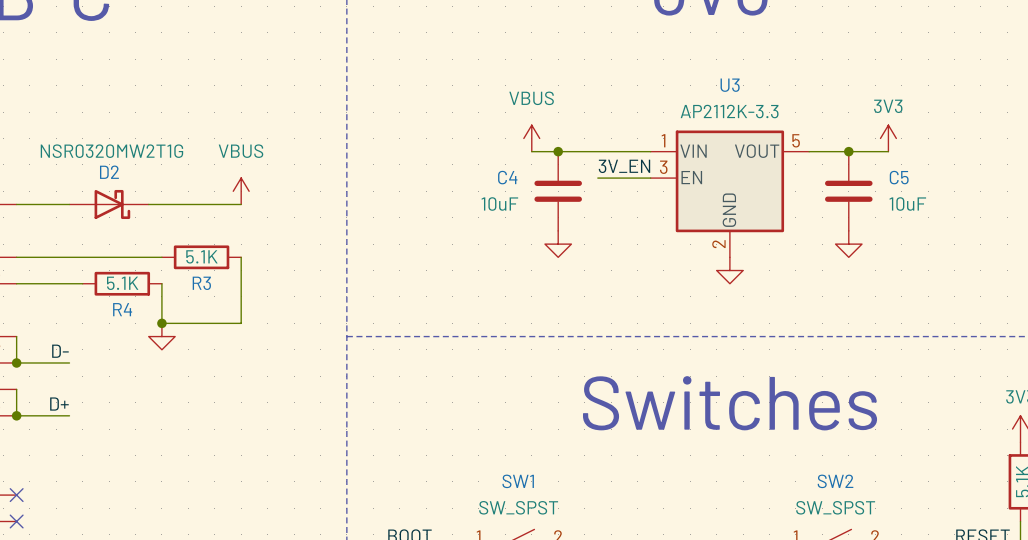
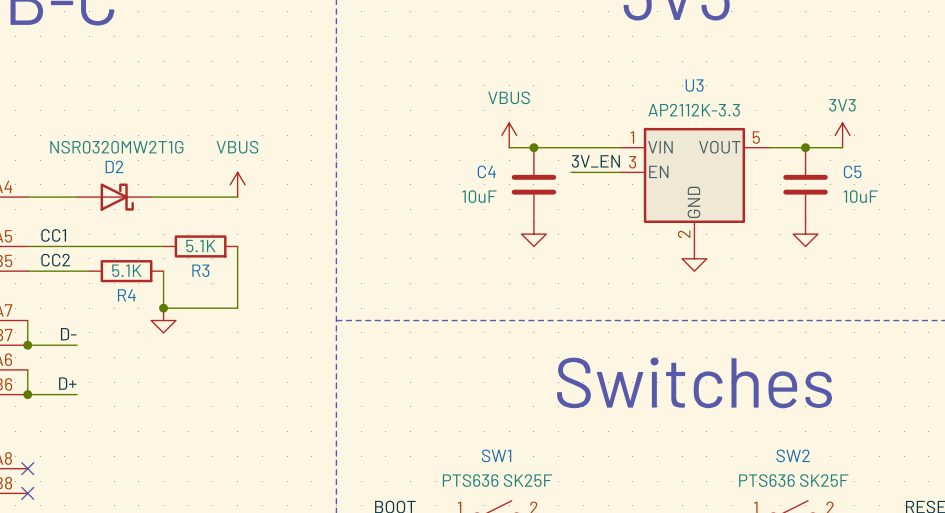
label: none -> CC1 (53, 235)
label: none -> CC2 (55, 260)
SW1 value: SW_SPST (518, 507) -> PTS636 SK25F (497, 480)
SW2 value: SW_SPST (835, 507) -> PTS636 SK25F (793, 480)

